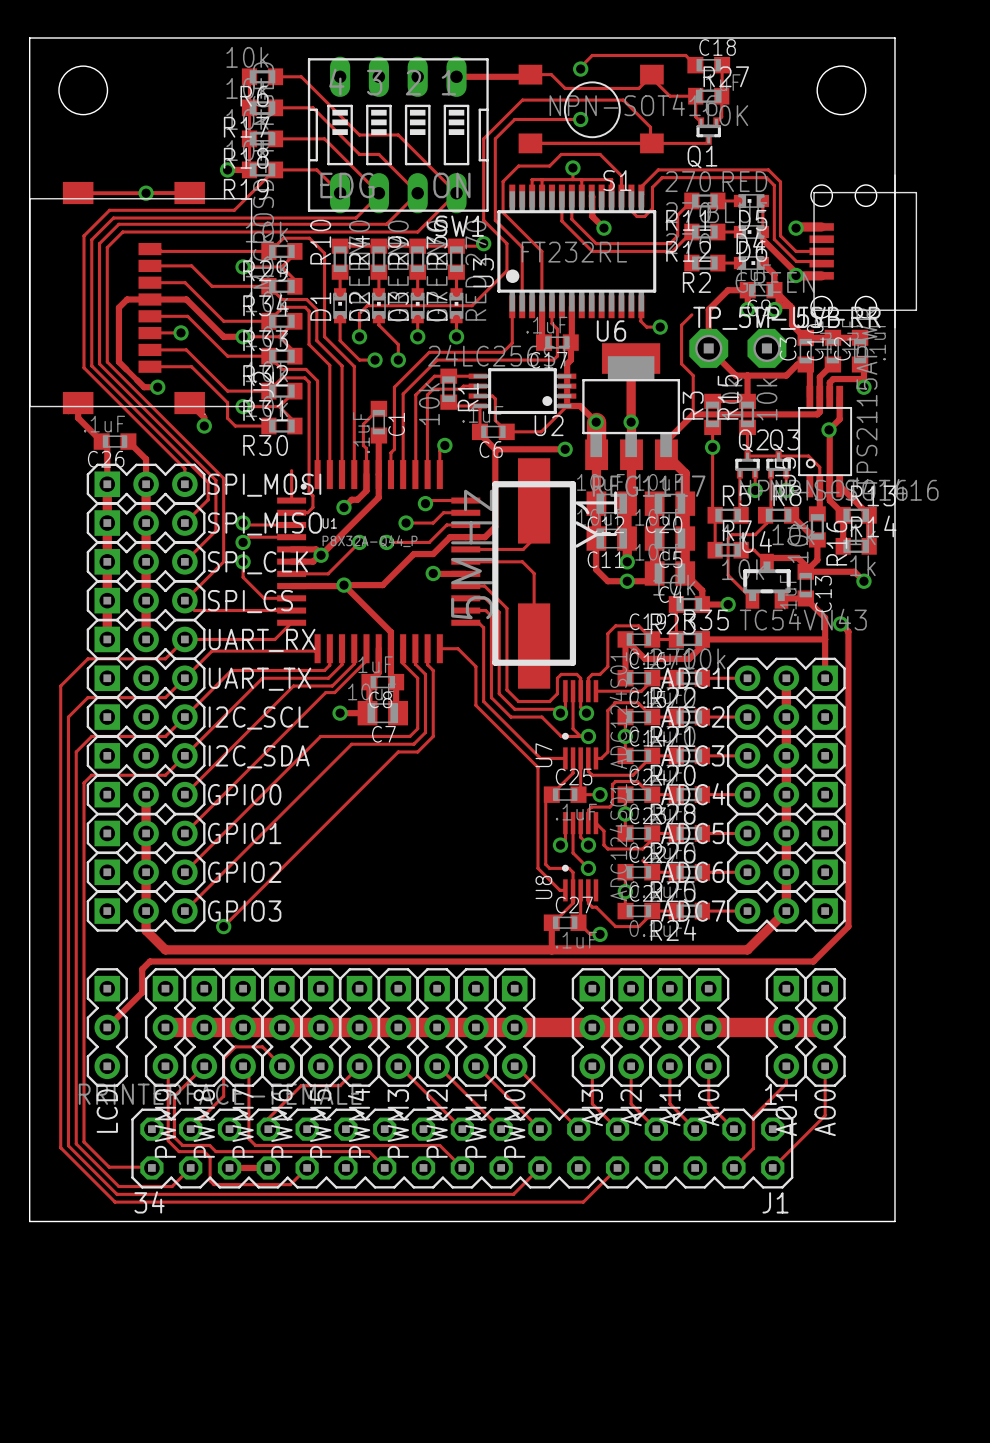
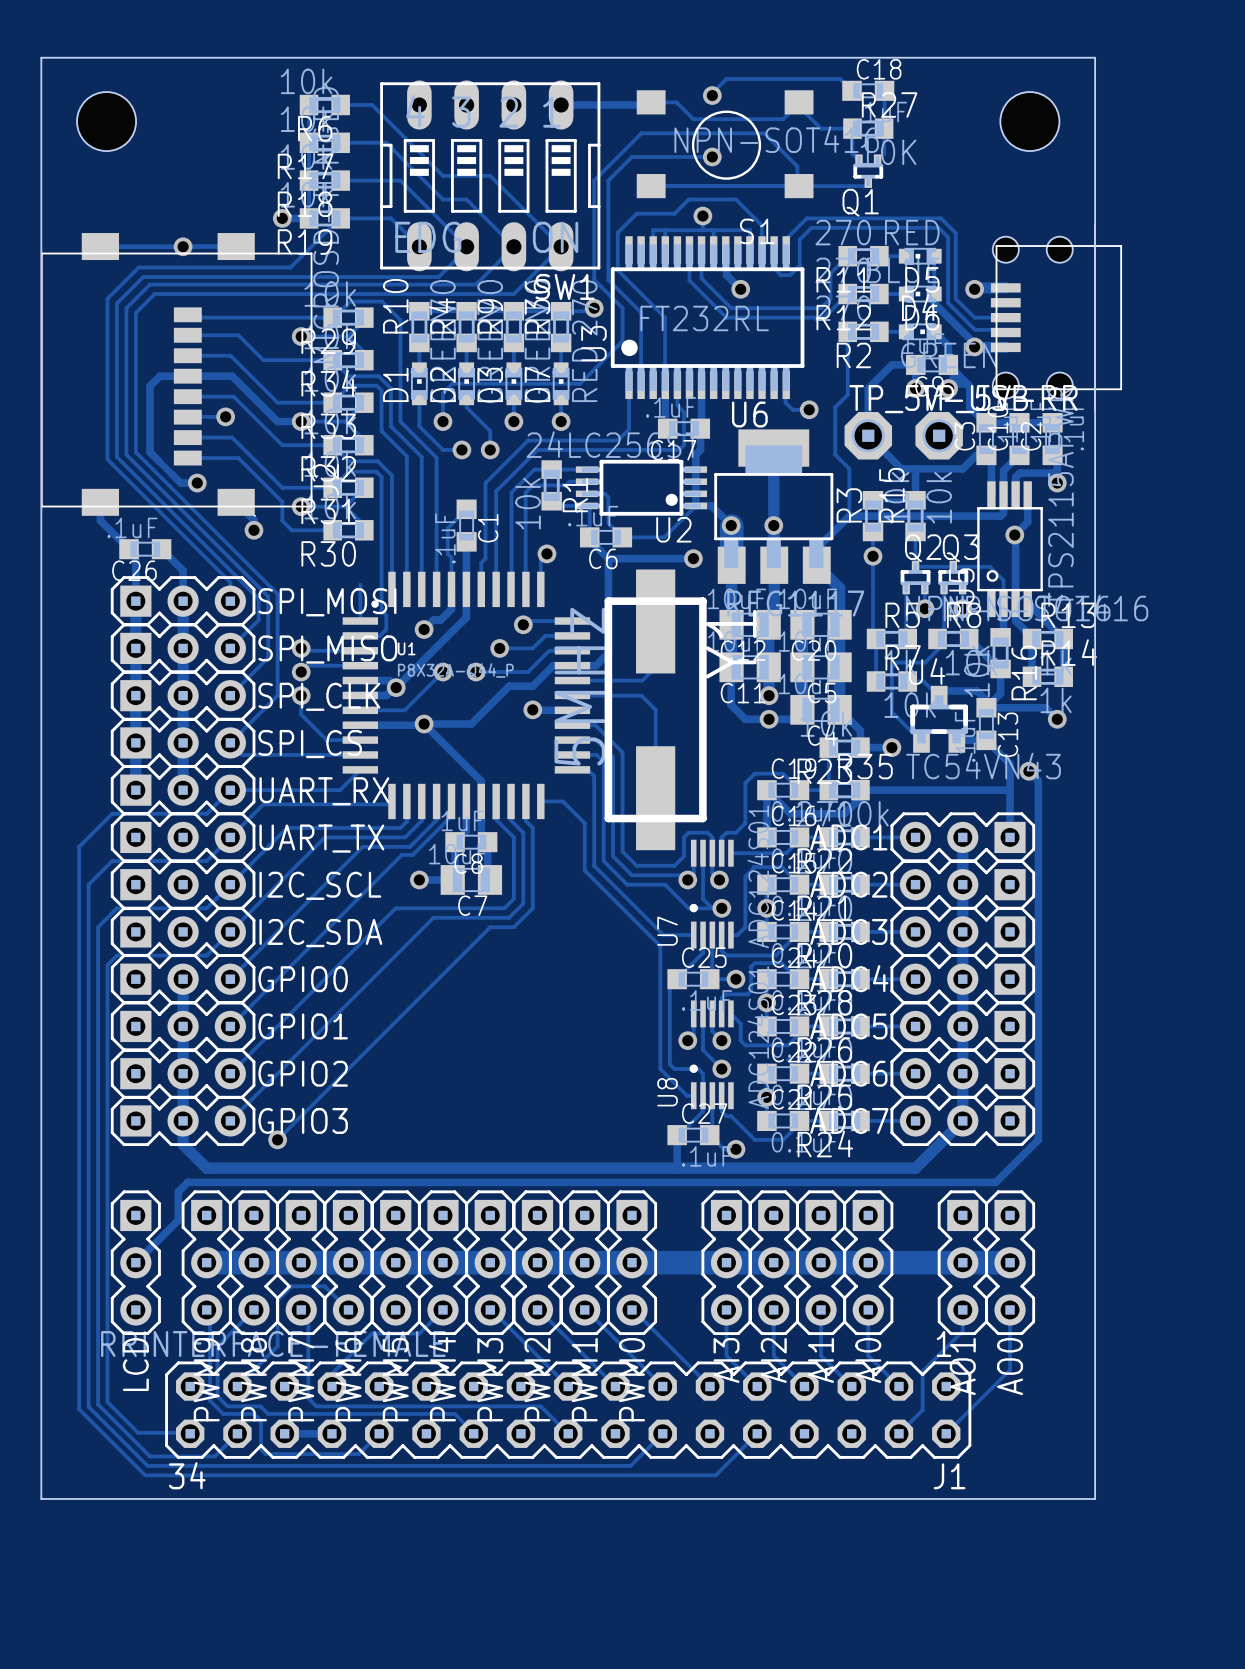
track: none -> (847, 331) (847, 394)

